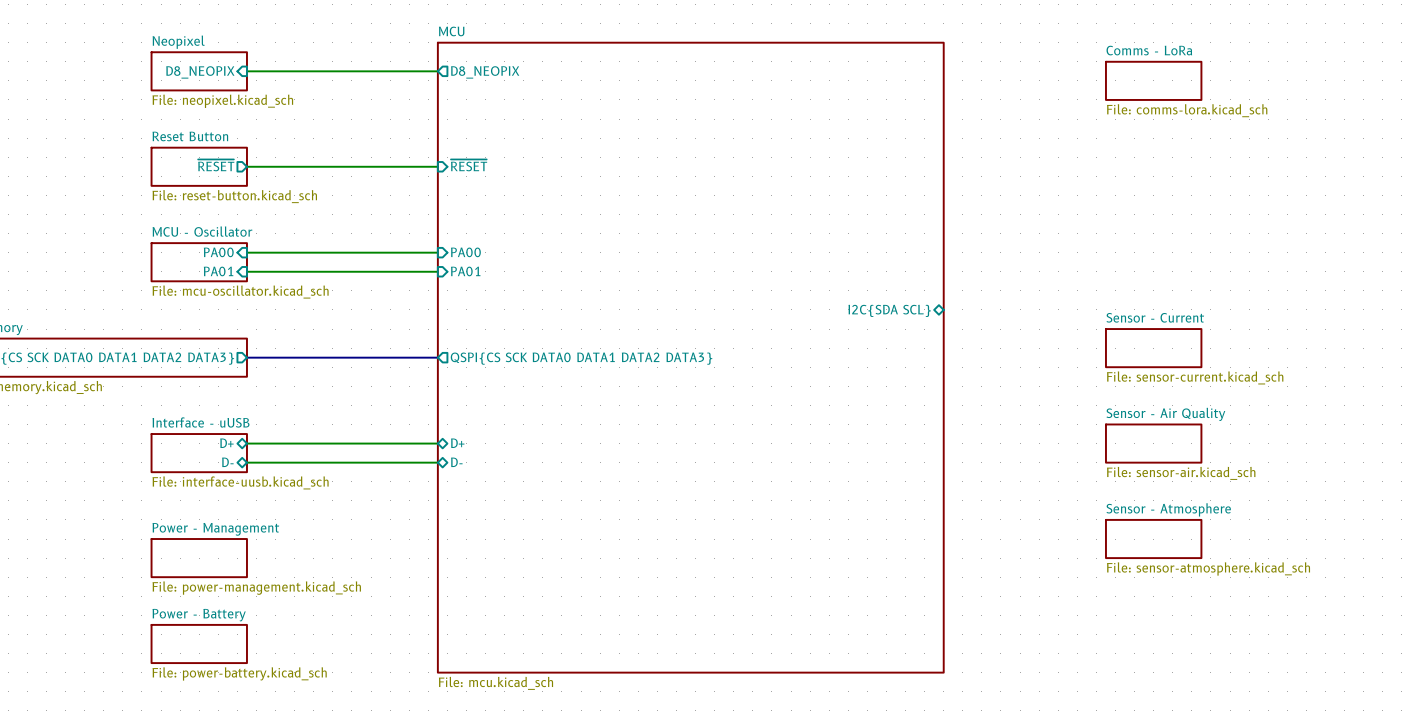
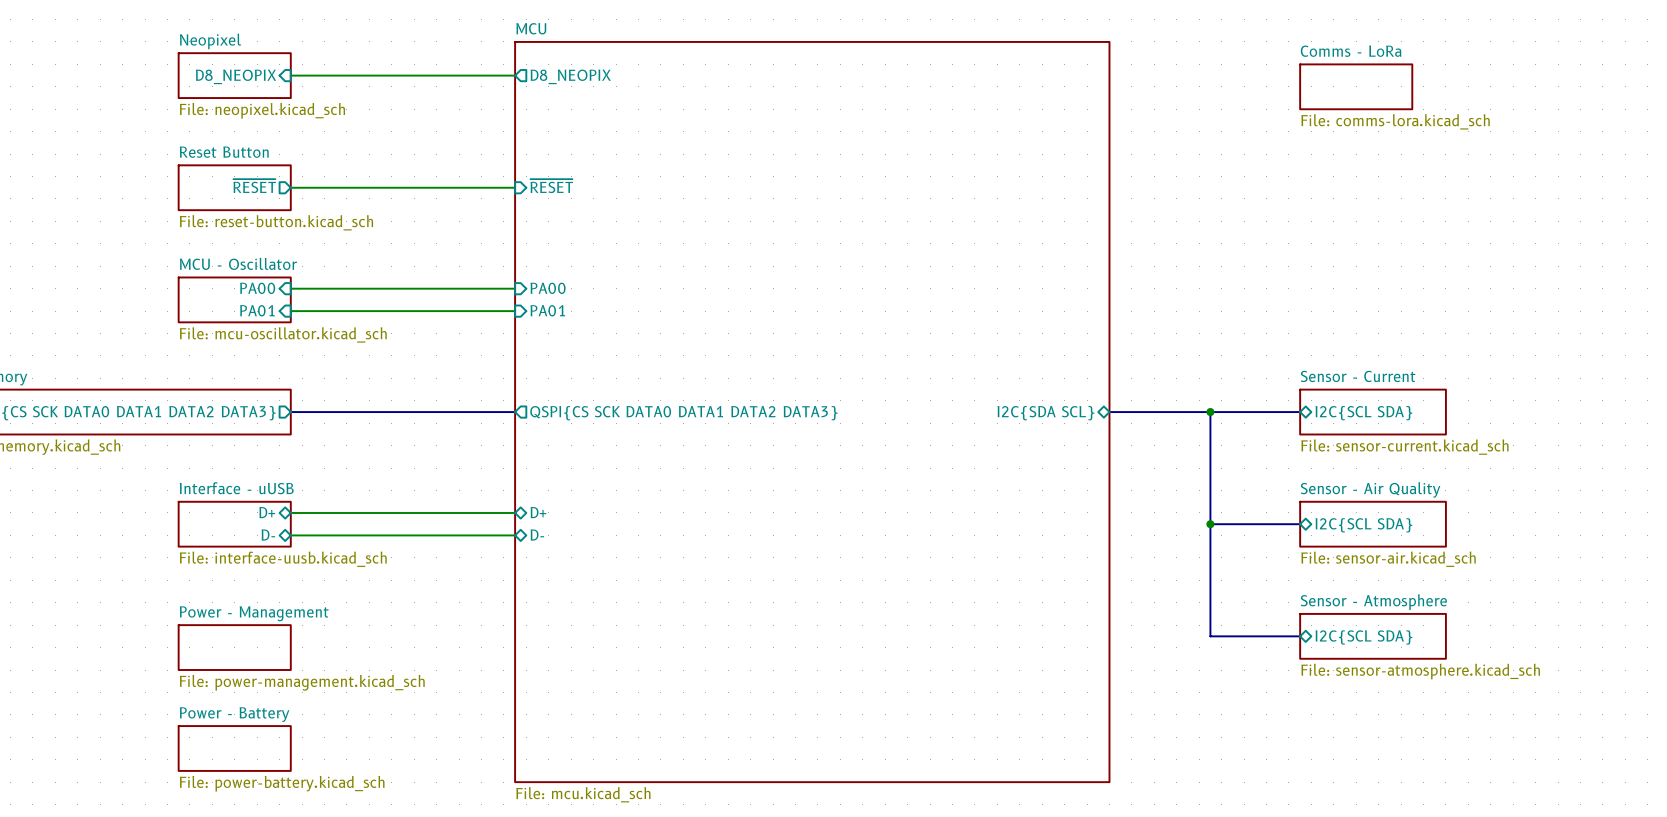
sheet pin position: I2C{SDA SCL} (889, 310) -> I2C{SDA SCL} (1045, 413)
sheet Sensor - Current: File: sensor-current.kicad_sch (1153, 348) -> none
bus: none -> (1109, 412) (1300, 412)
bus: none -> (1210, 412) (1210, 636) (1300, 636)
junction: none -> (1210, 412)
sheet Sensor - Current: none -> File: sensor-current.kicad_sch (1373, 412)
sheet pin: none -> I2C{SCL SDA} (1363, 413)
sheet Sensor - Air Quality: File: sensor-air.kicad_sch (1153, 443) -> none
bus: none -> (1210, 524) (1300, 524)
junction: none -> (1210, 524)
sheet Sensor - Air Quality: none -> File: sensor-air.kicad_sch (1373, 524)
sheet pin: none -> I2C{SCL SDA} (1363, 525)
sheet Sensor - Atmosphere: File: sensor-atmosphere.kicad_sch (1153, 539) -> none
sheet Sensor - Atmosphere: none -> File: sensor-atmosphere.kicad_sch (1373, 636)
sheet pin: none -> I2C{SCL SDA} (1363, 637)

